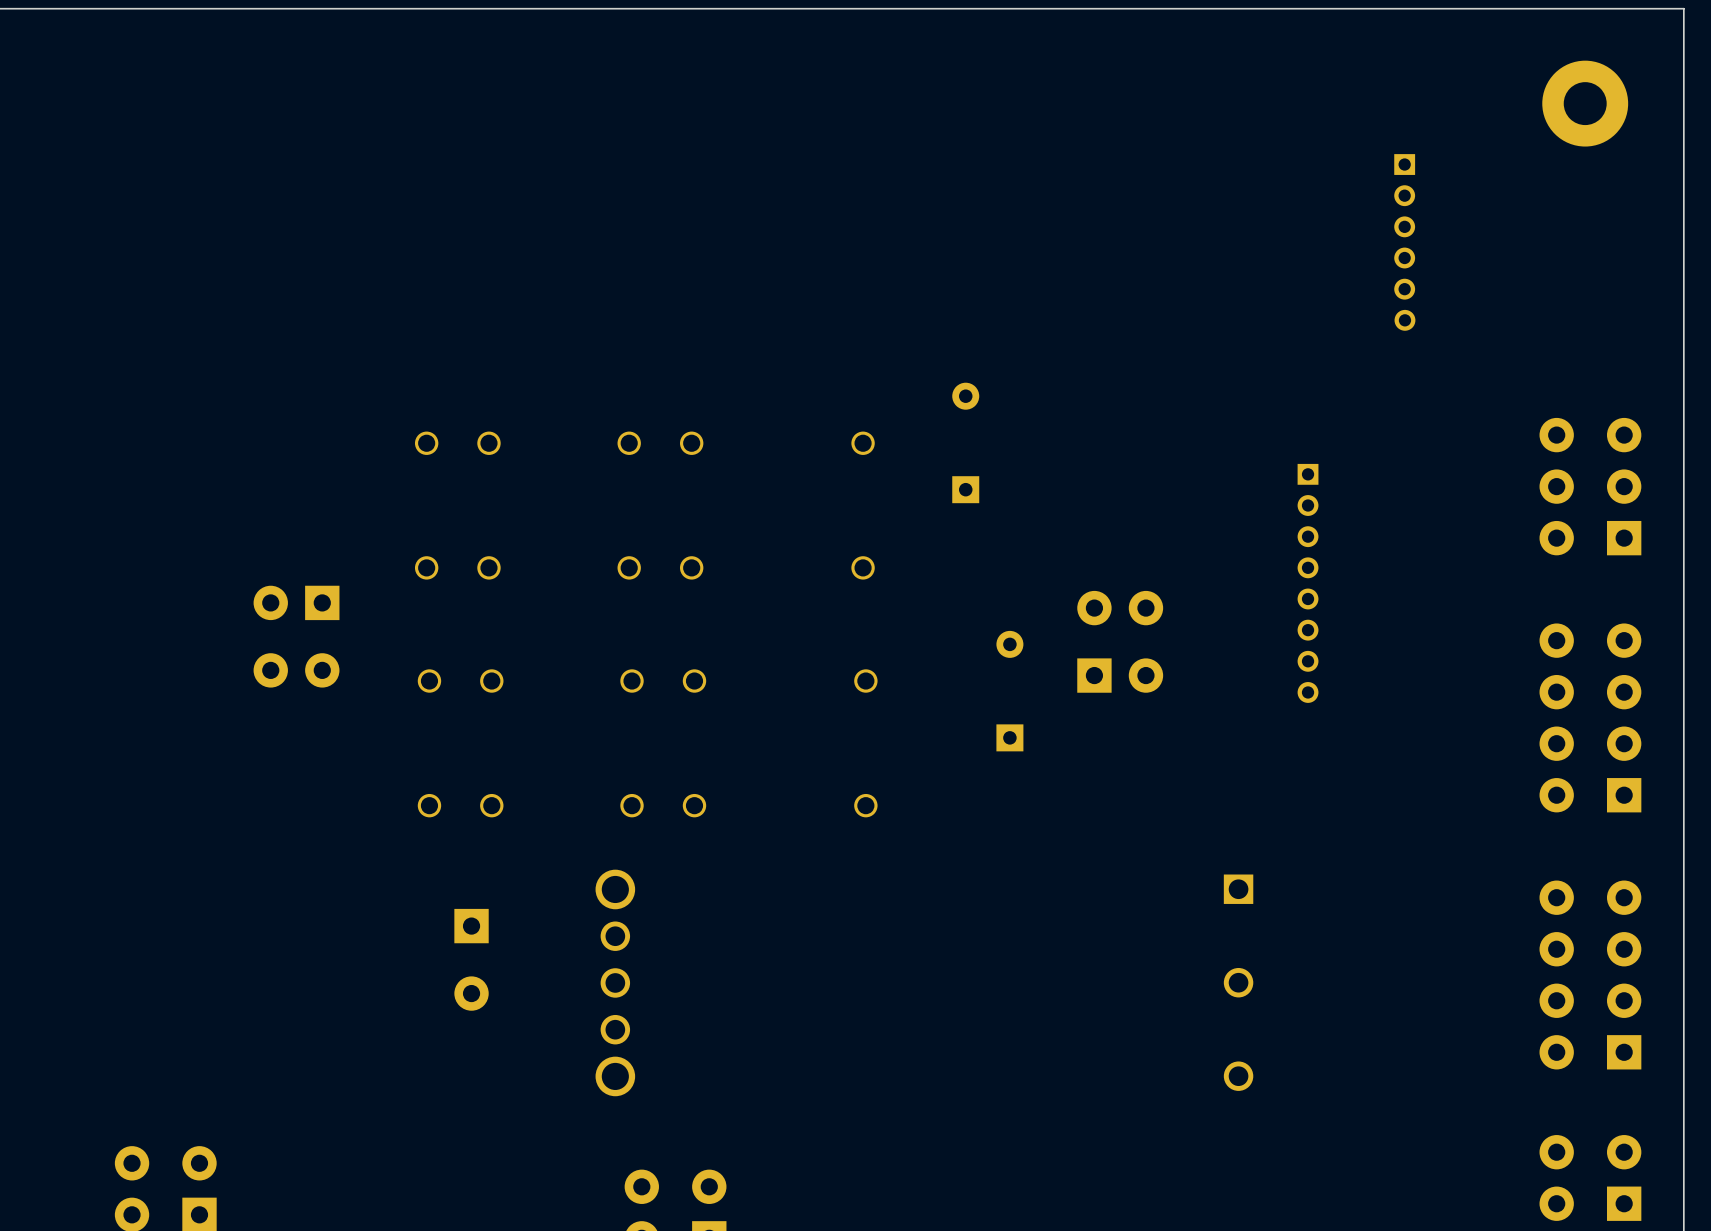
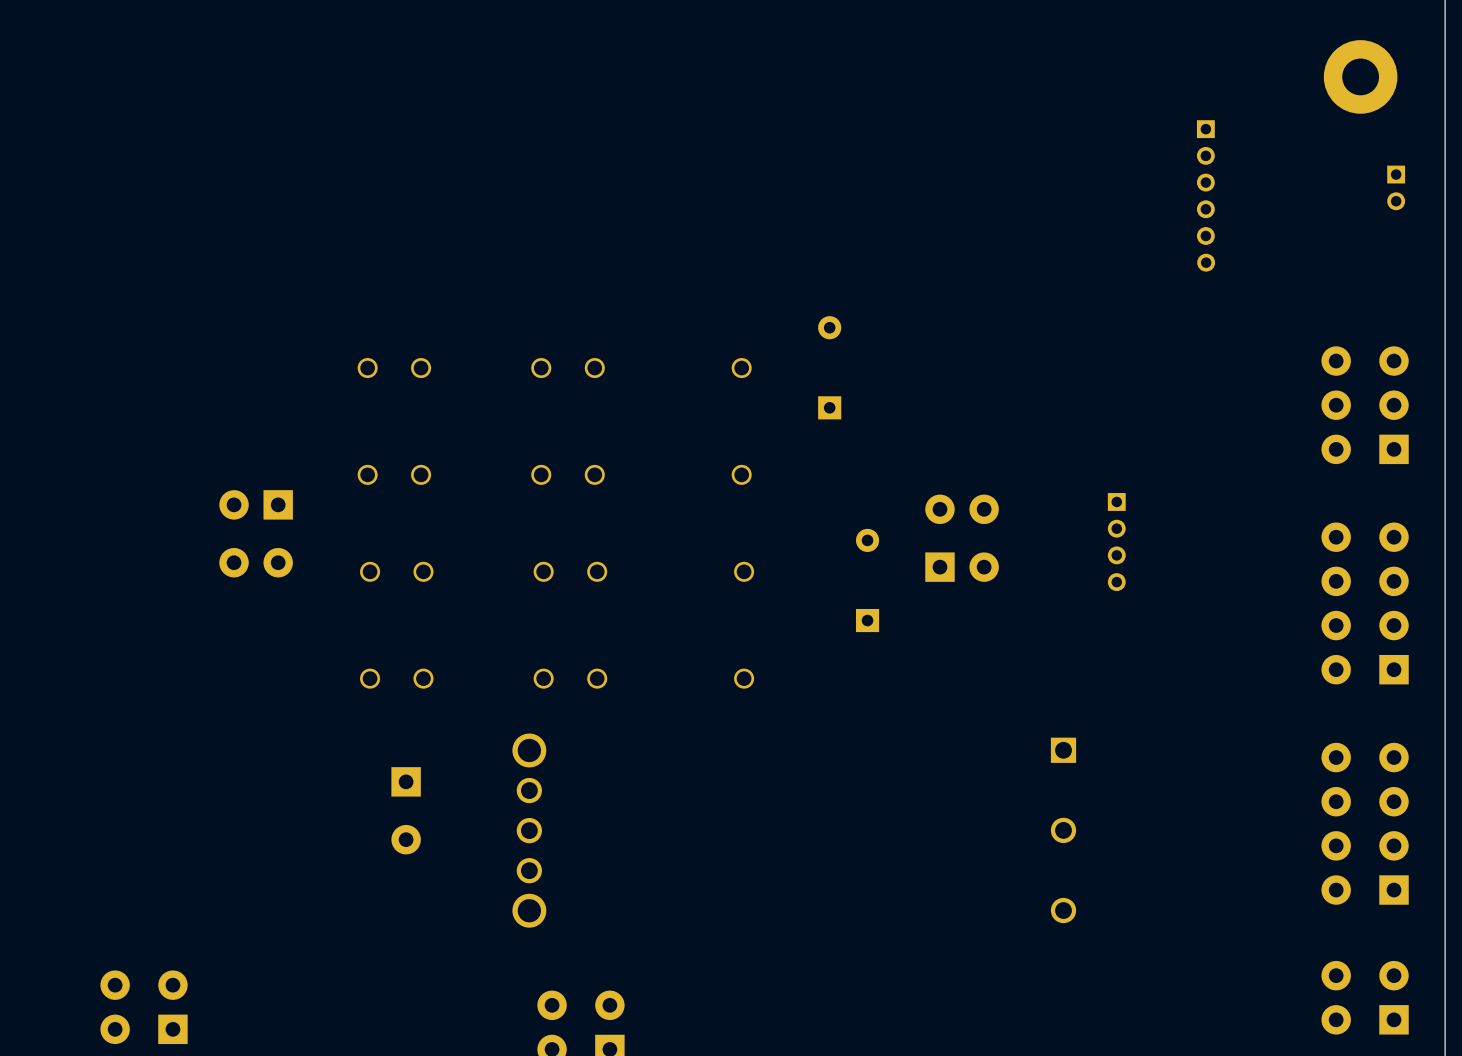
part: none -> (1396, 187)
part: (1308, 583) -> none
part: none -> (1116, 542)

